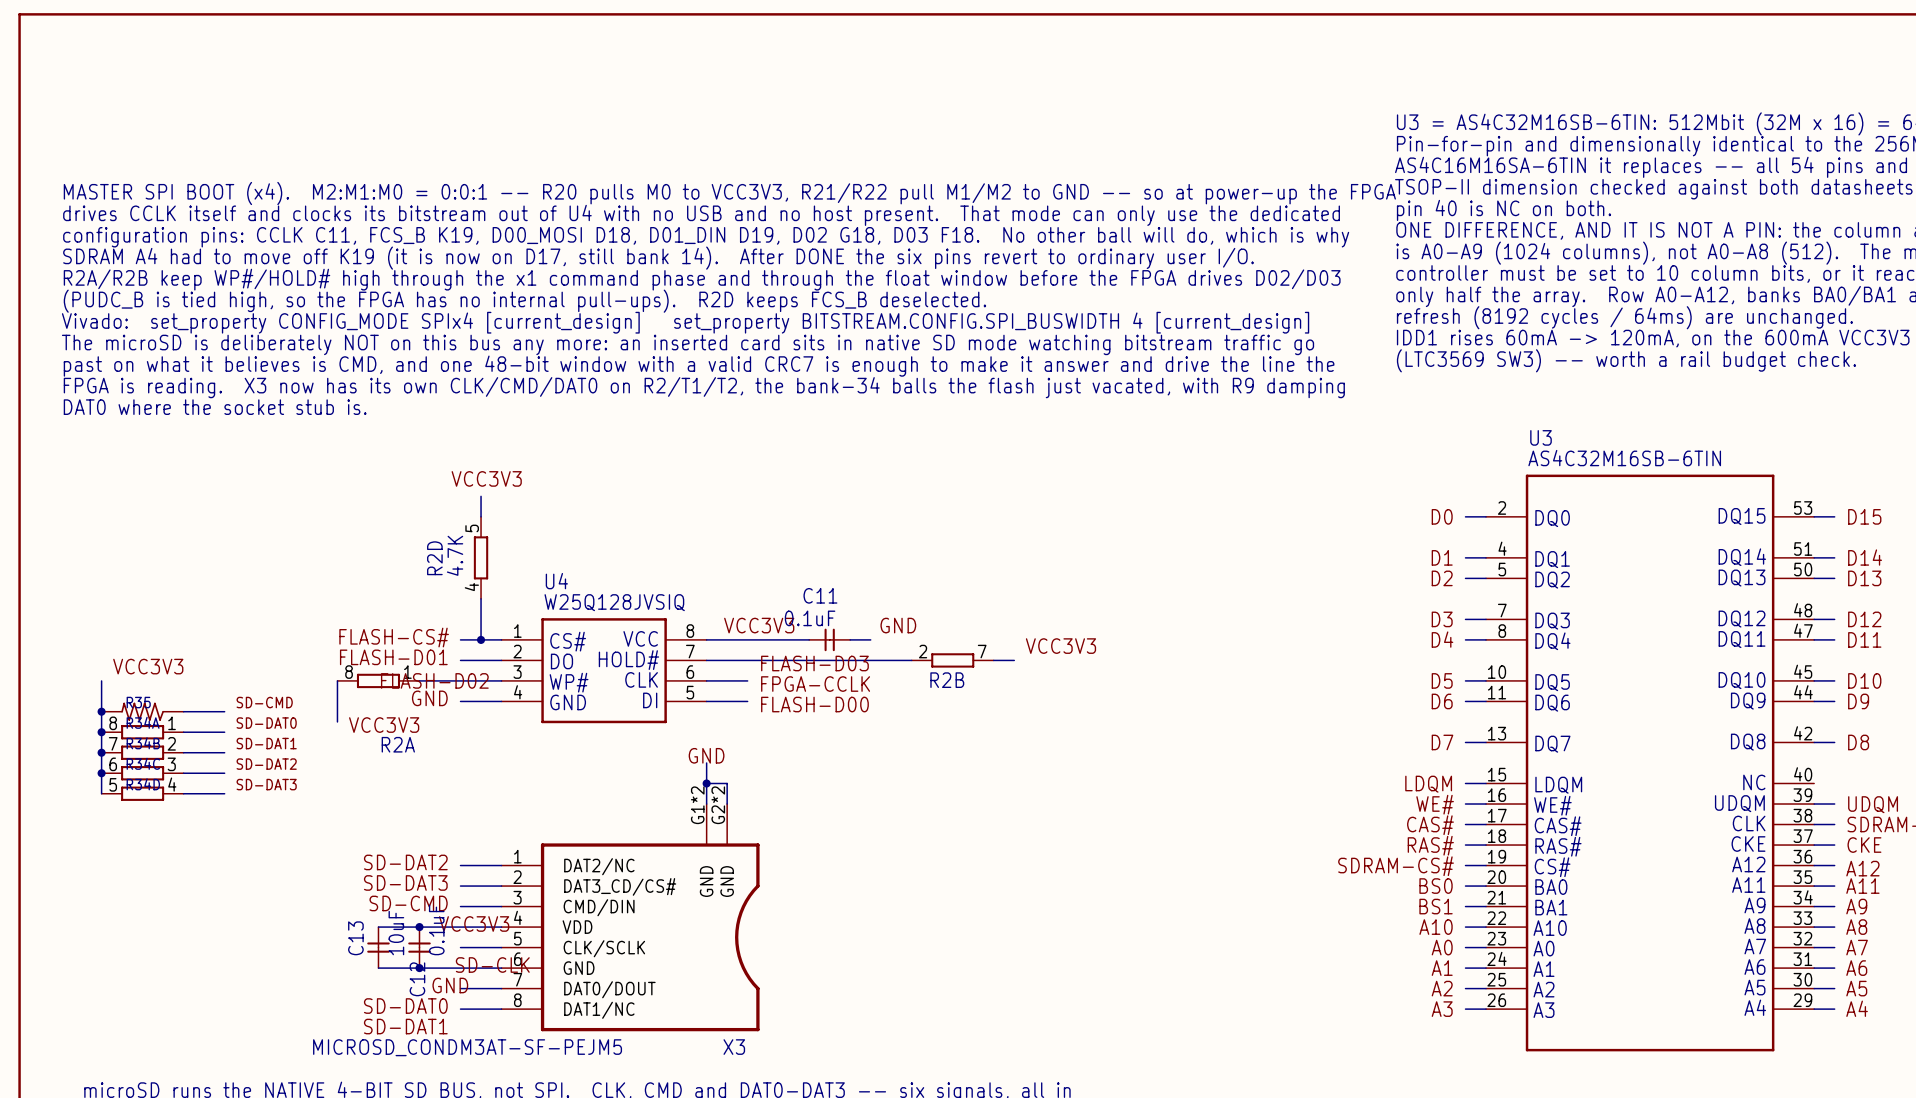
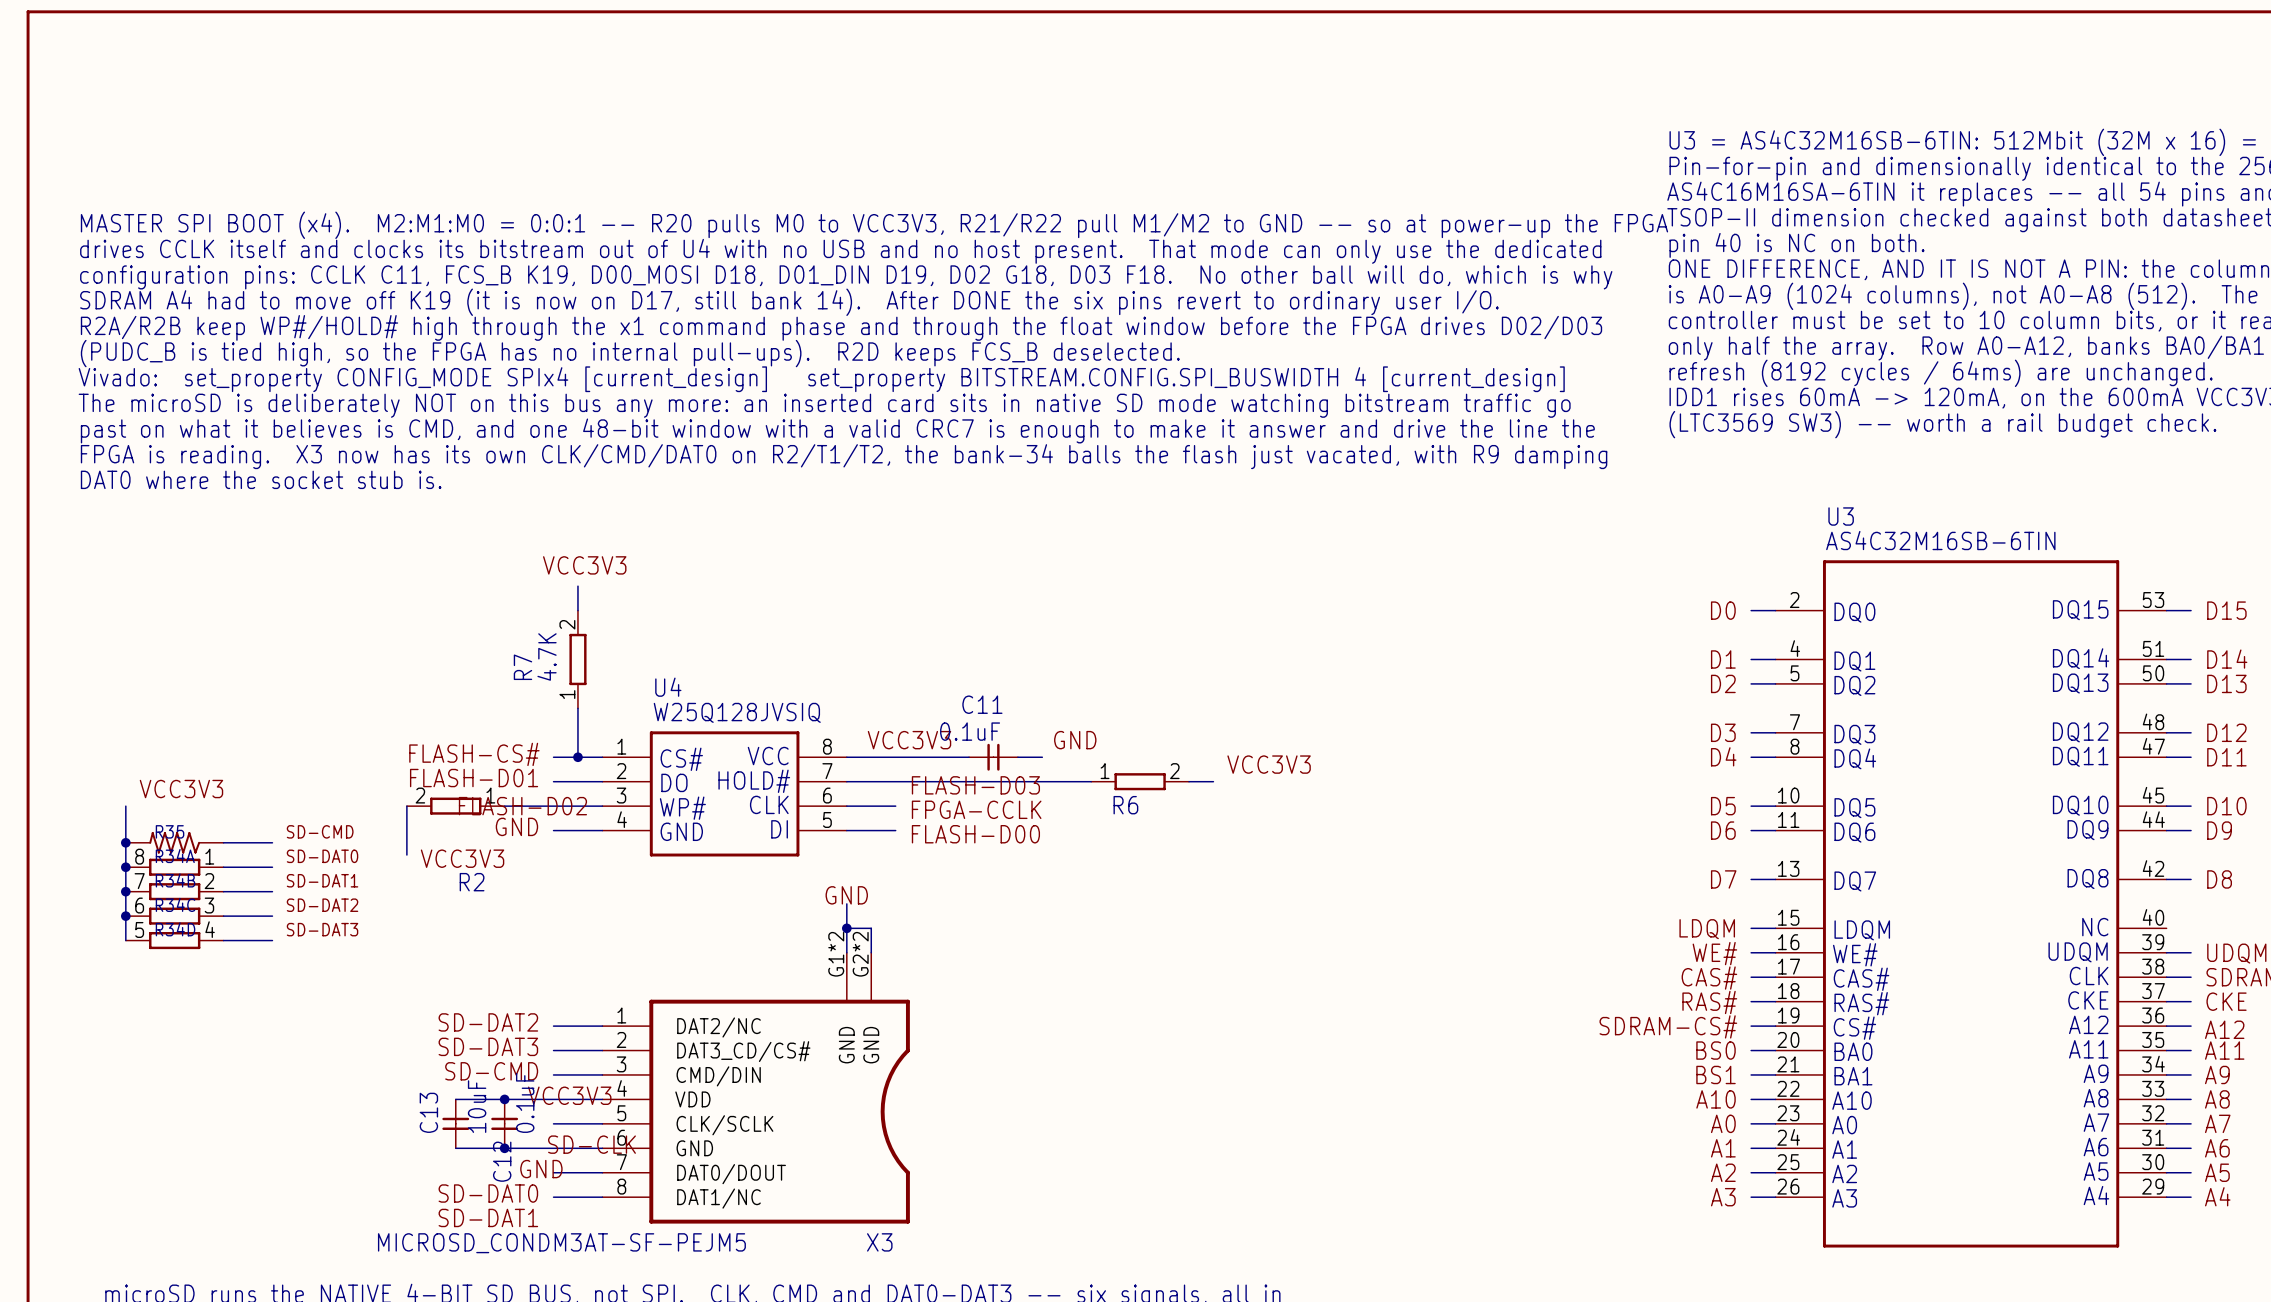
R2D pin number: 5 (472, 528) -> 2 (567, 624)
R2D name: R2D (434, 558) -> R7 (522, 667)
R2D pin number: 4 (471, 587) -> 1 (567, 694)
R2B pin number: 2 (923, 651) -> 1 (1105, 771)
R2B pin number: 7 (982, 651) -> 2 (1174, 771)
R2A pin number: 8 (349, 672) -> 2 (420, 795)
R2B name: R2B (947, 680) -> R6 (1125, 805)
R2A name: R2A (398, 744) -> R2 (472, 882)

